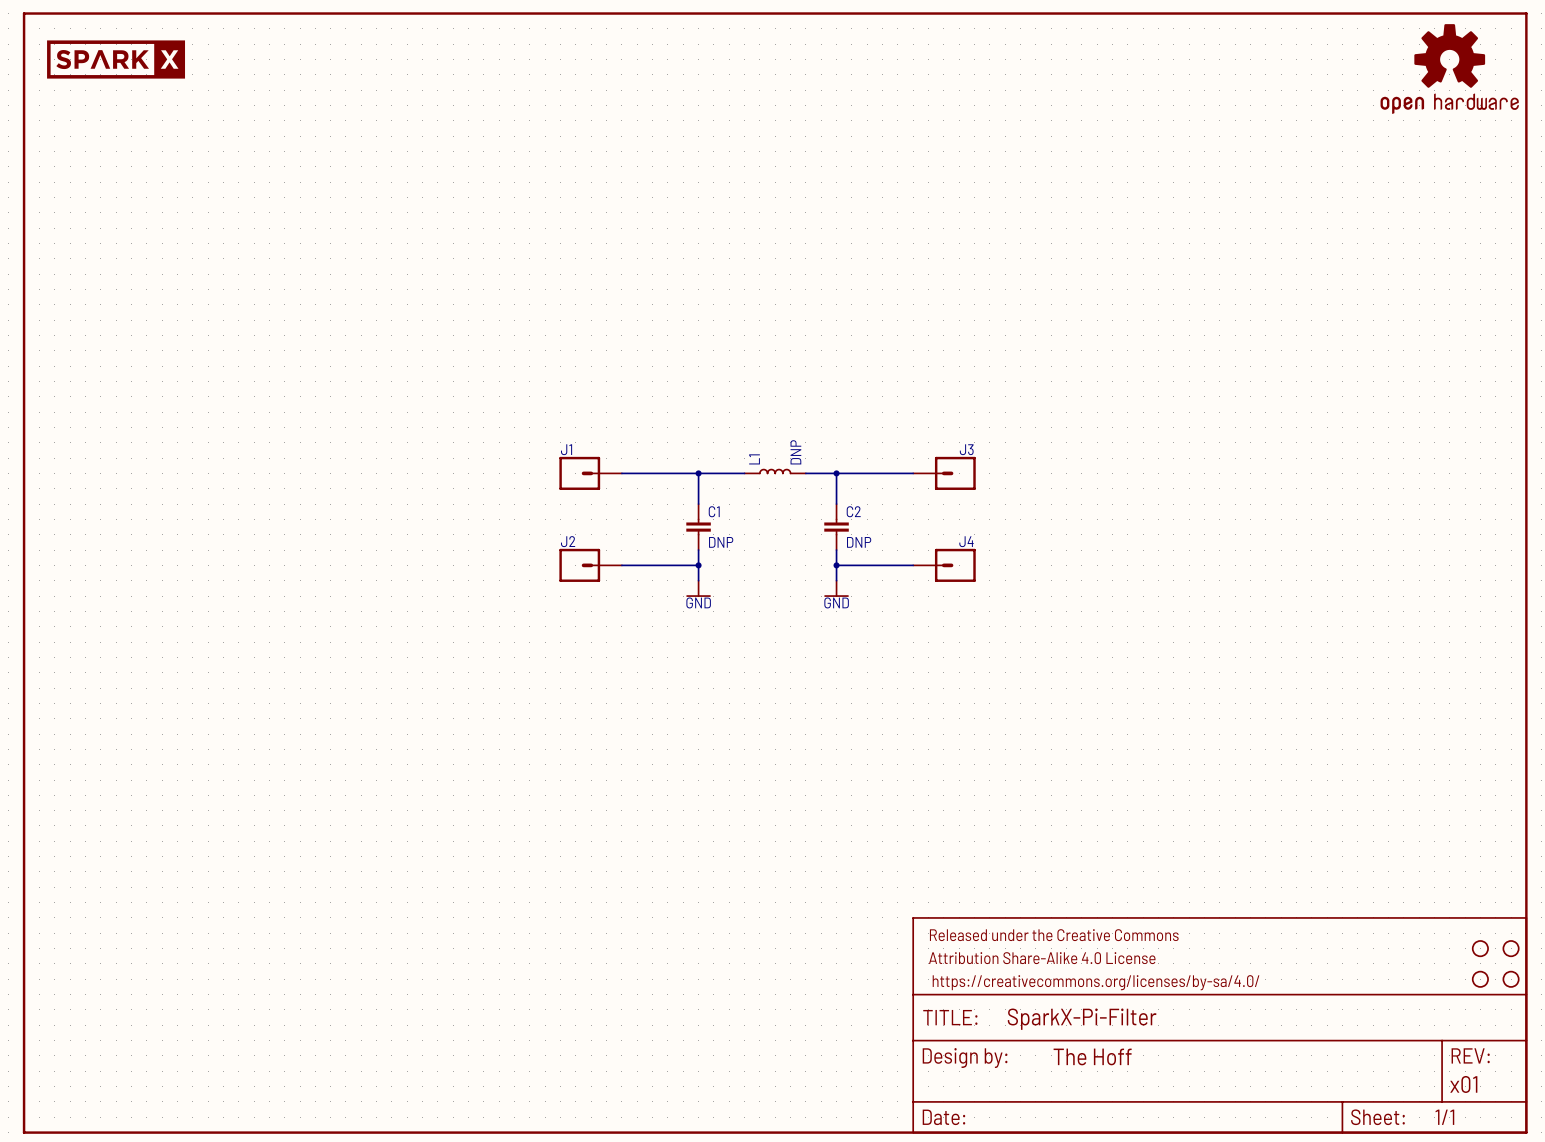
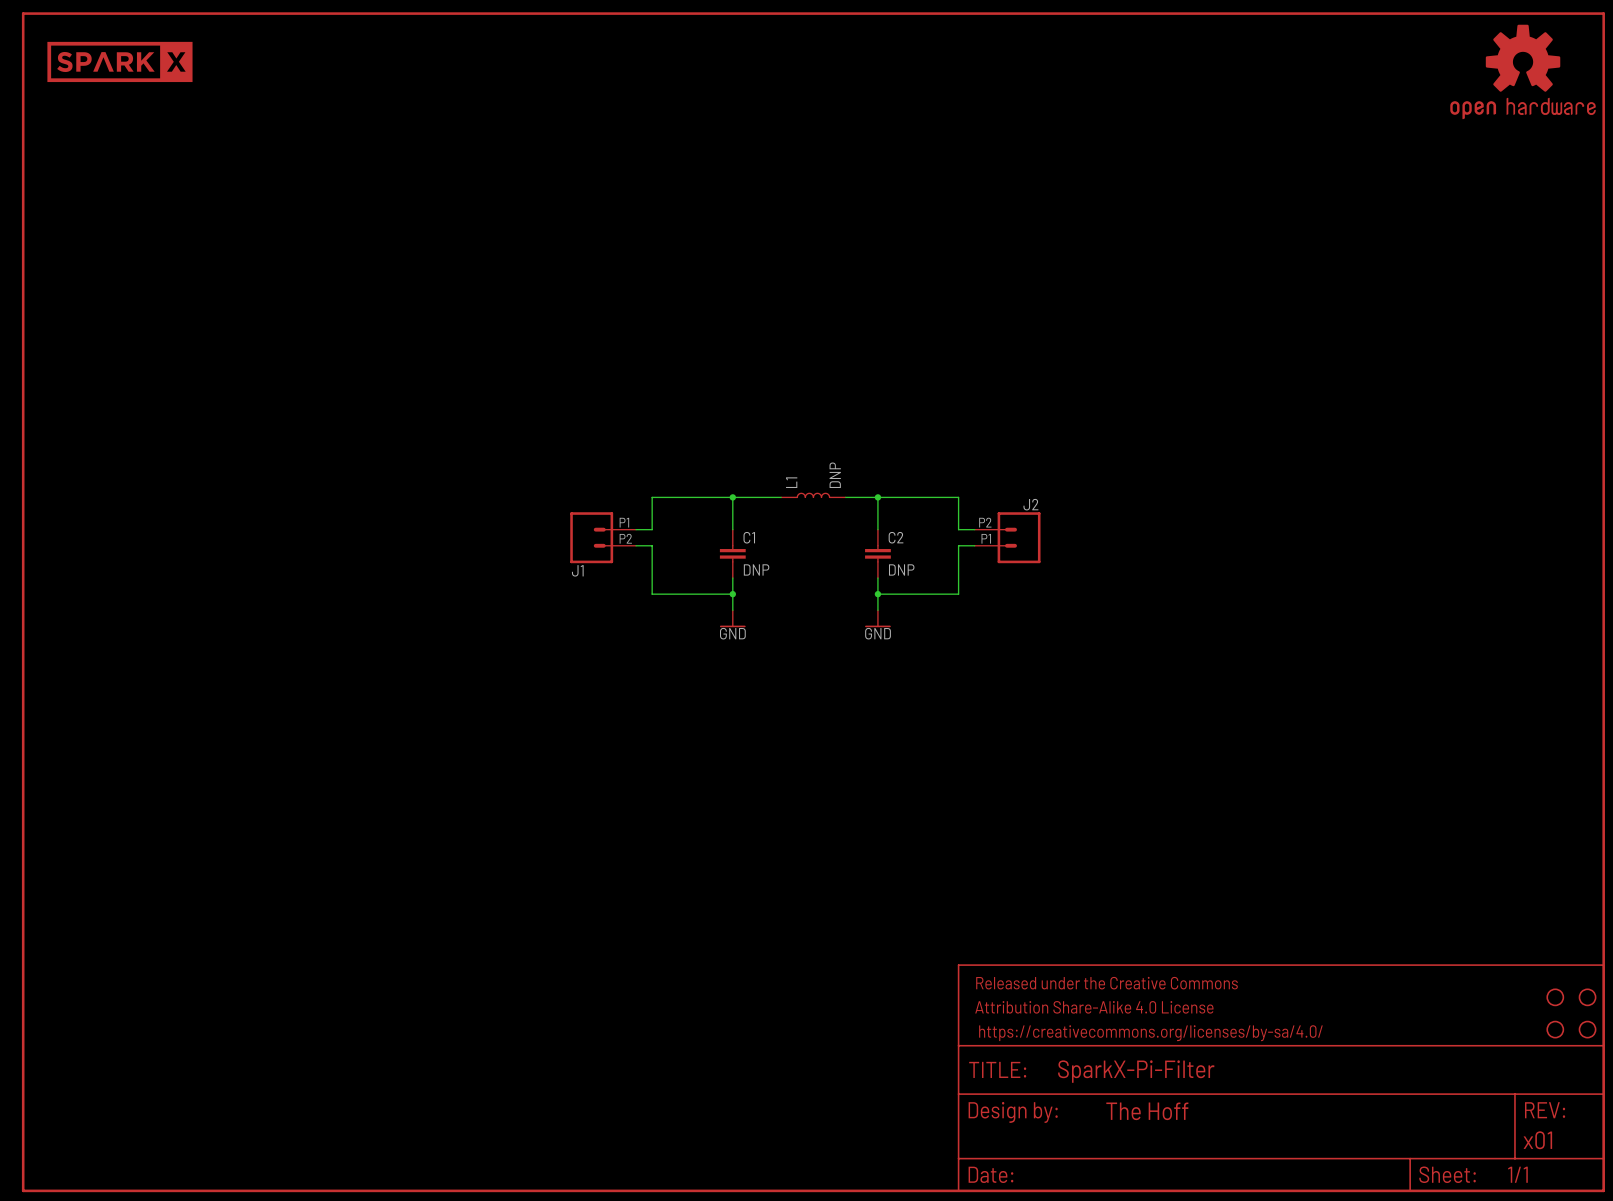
J1 name position: J1 (566, 449) -> J1 (577, 570)
J1 symbol: [559, 456, 622, 490] -> [570, 512, 637, 564]
wire: none -> (652, 497) (652, 529) (636, 529)
wire: none -> (958, 497) (958, 529) (974, 529)
J3: (944, 473) -> none
wire: none -> (636, 545) (652, 545) (652, 594)
wire: none -> (974, 545) (958, 545) (958, 594)
J2 name position: J2 (568, 541) -> J2 (1030, 504)
J2 symbol: [559, 548, 622, 582] -> [974, 512, 1041, 564]
J4: (944, 565) -> none

